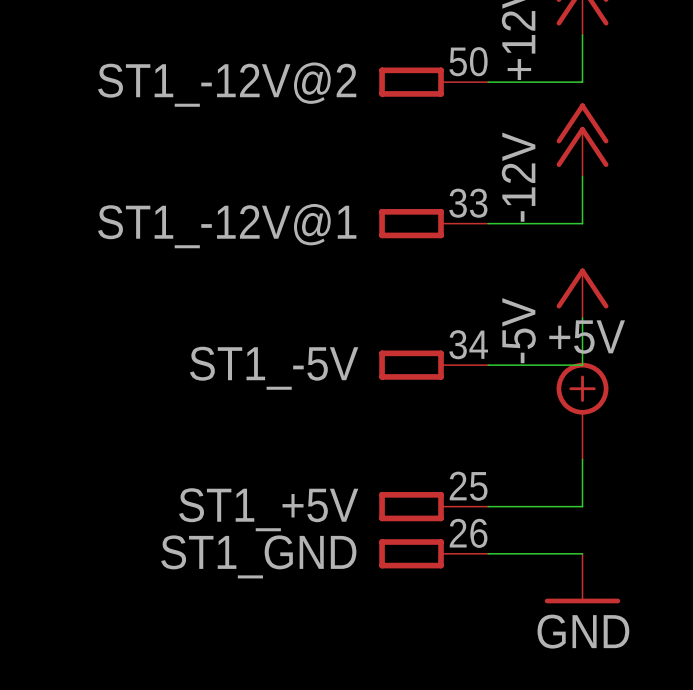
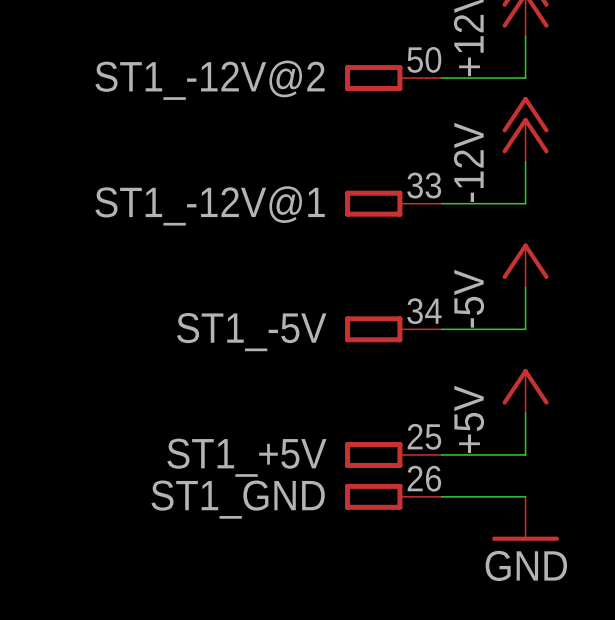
power symbol: +5V (582, 411) -> none
power symbol: none -> +5V (525, 391)

